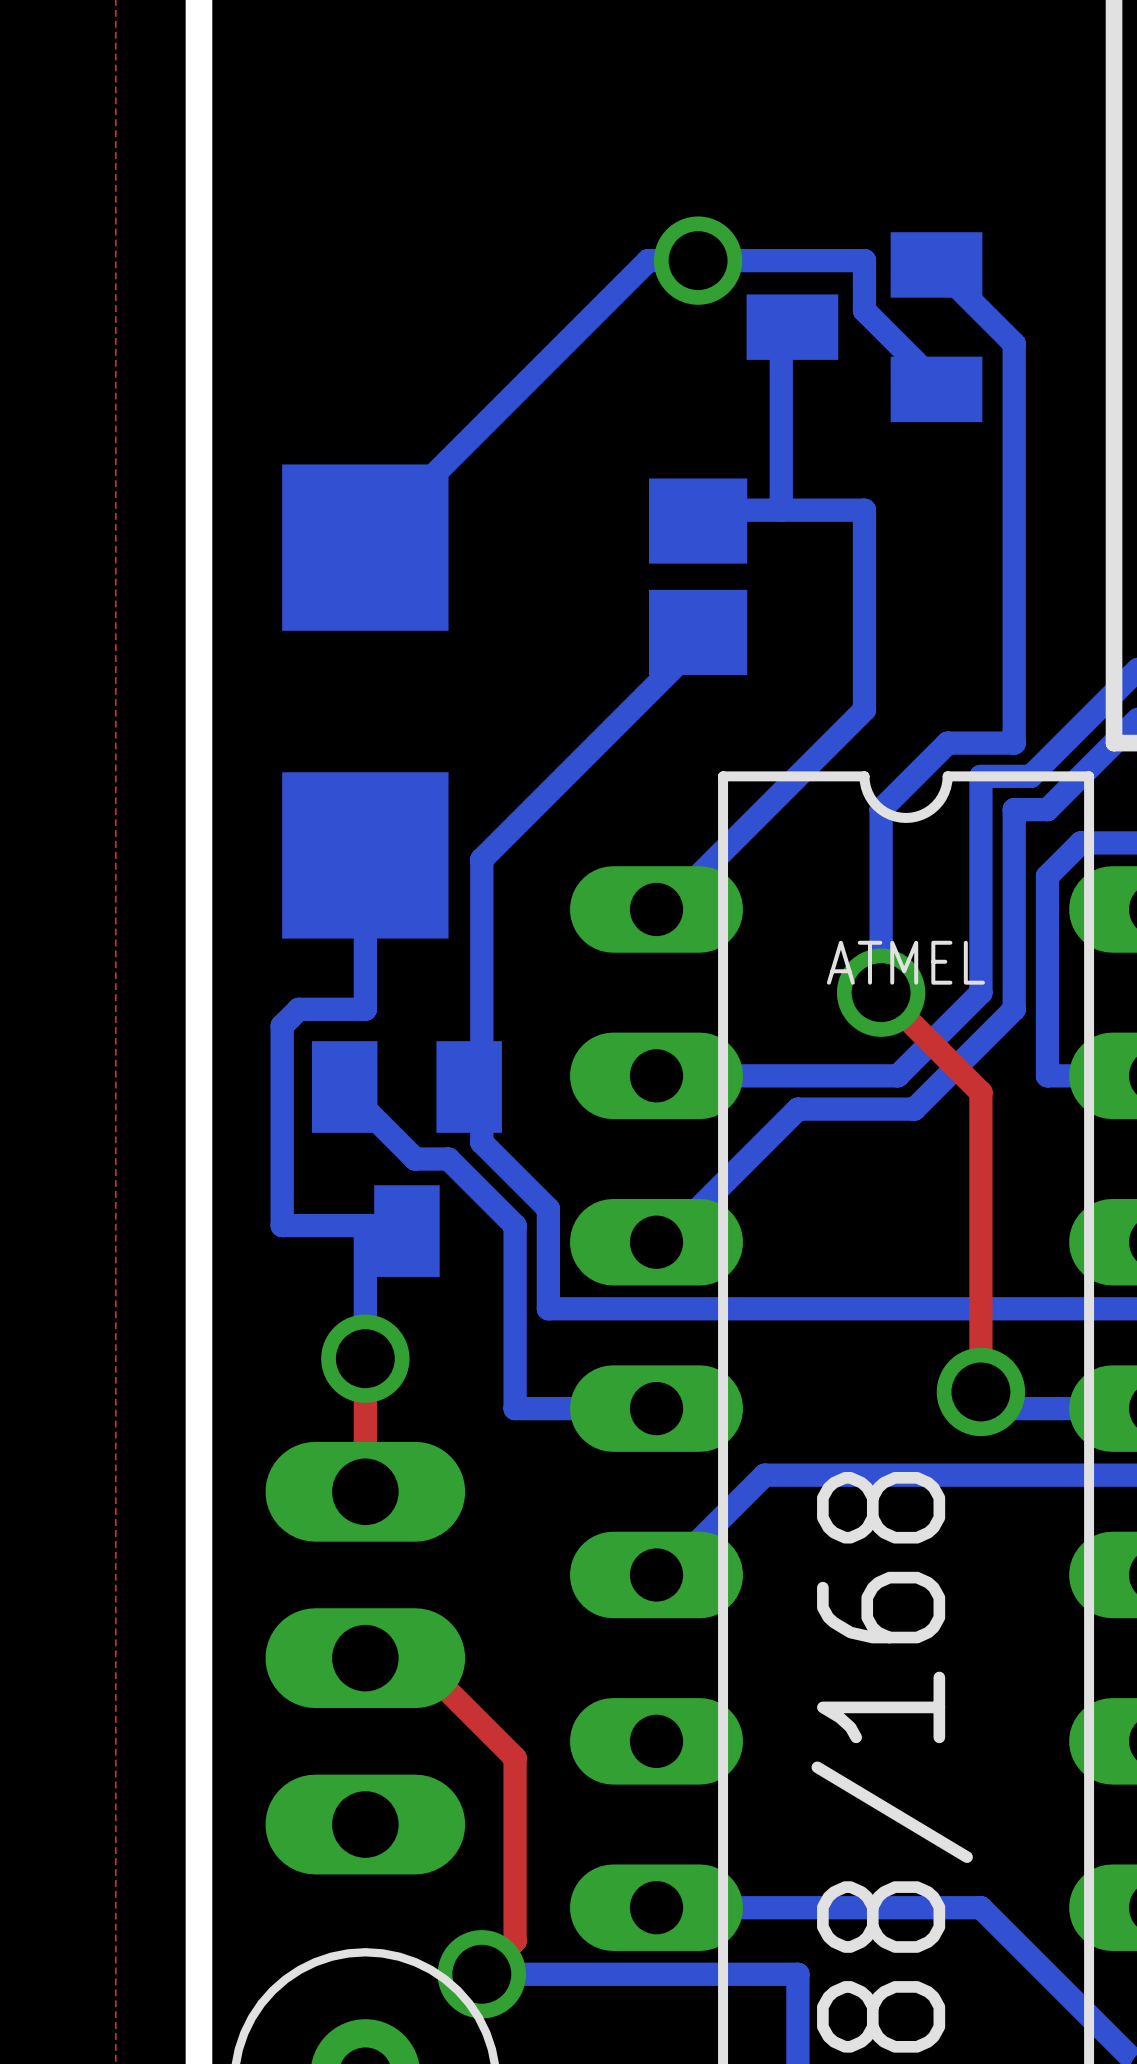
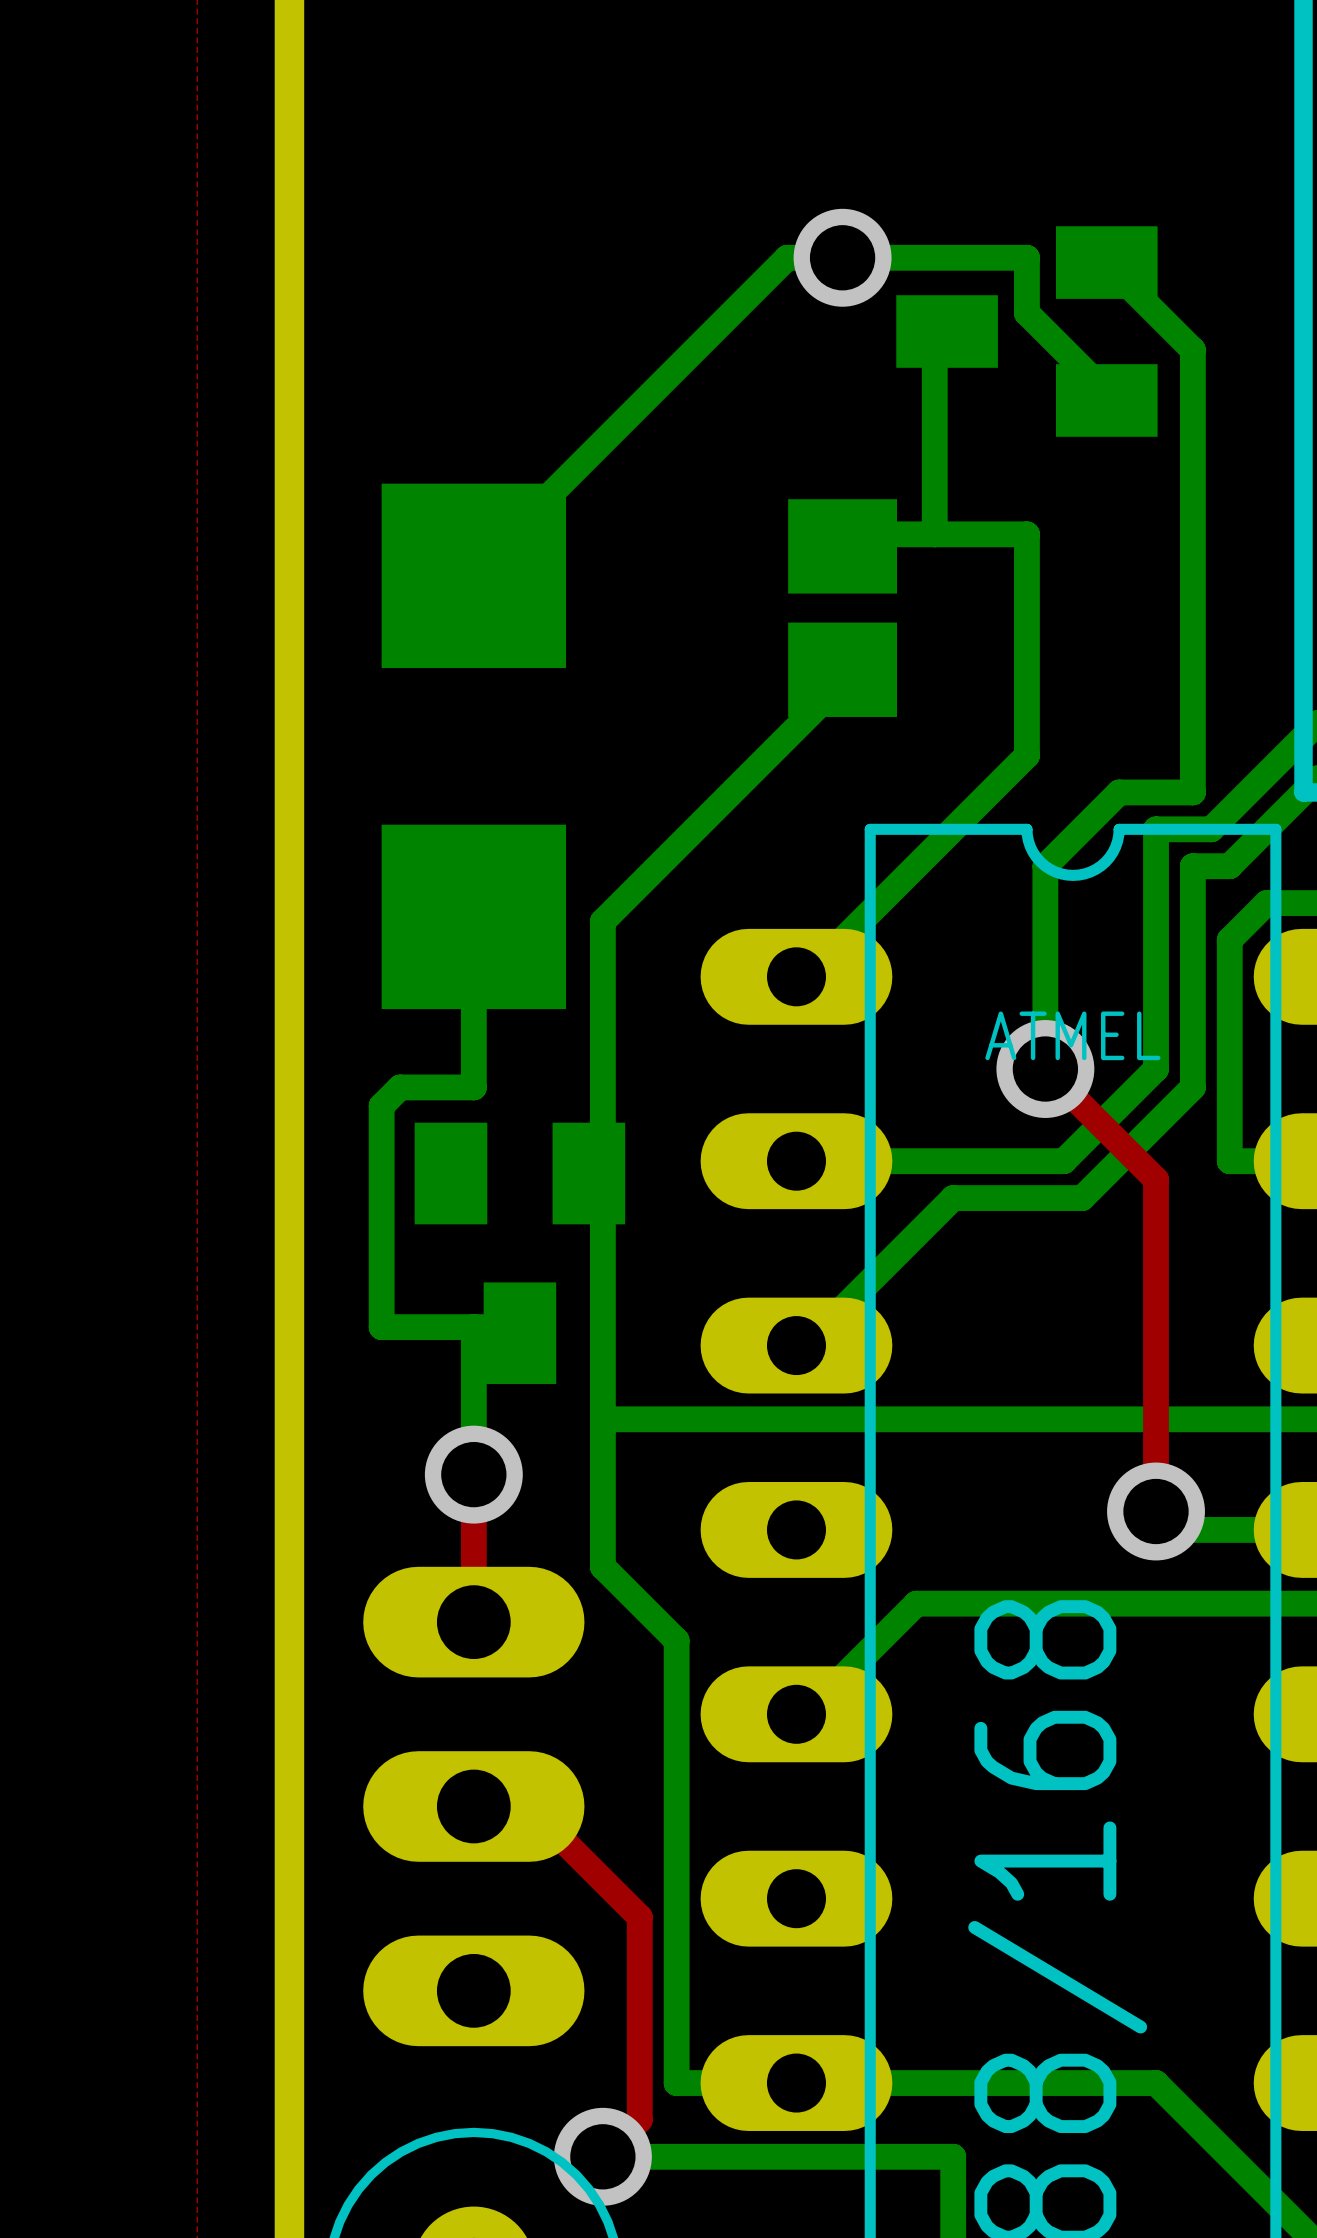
bottom track: (344, 1086) (415, 1159) (448, 1159) (515, 1225) (515, 1408) (656, 1408) -> none
bottom track: (481, 1142) (548, 1208) (548, 1308) -> (602, 1419) (676, 1419)
bottom track: none -> (602, 1234) (602, 1566) (676, 1640) (676, 2083) (796, 2083)

